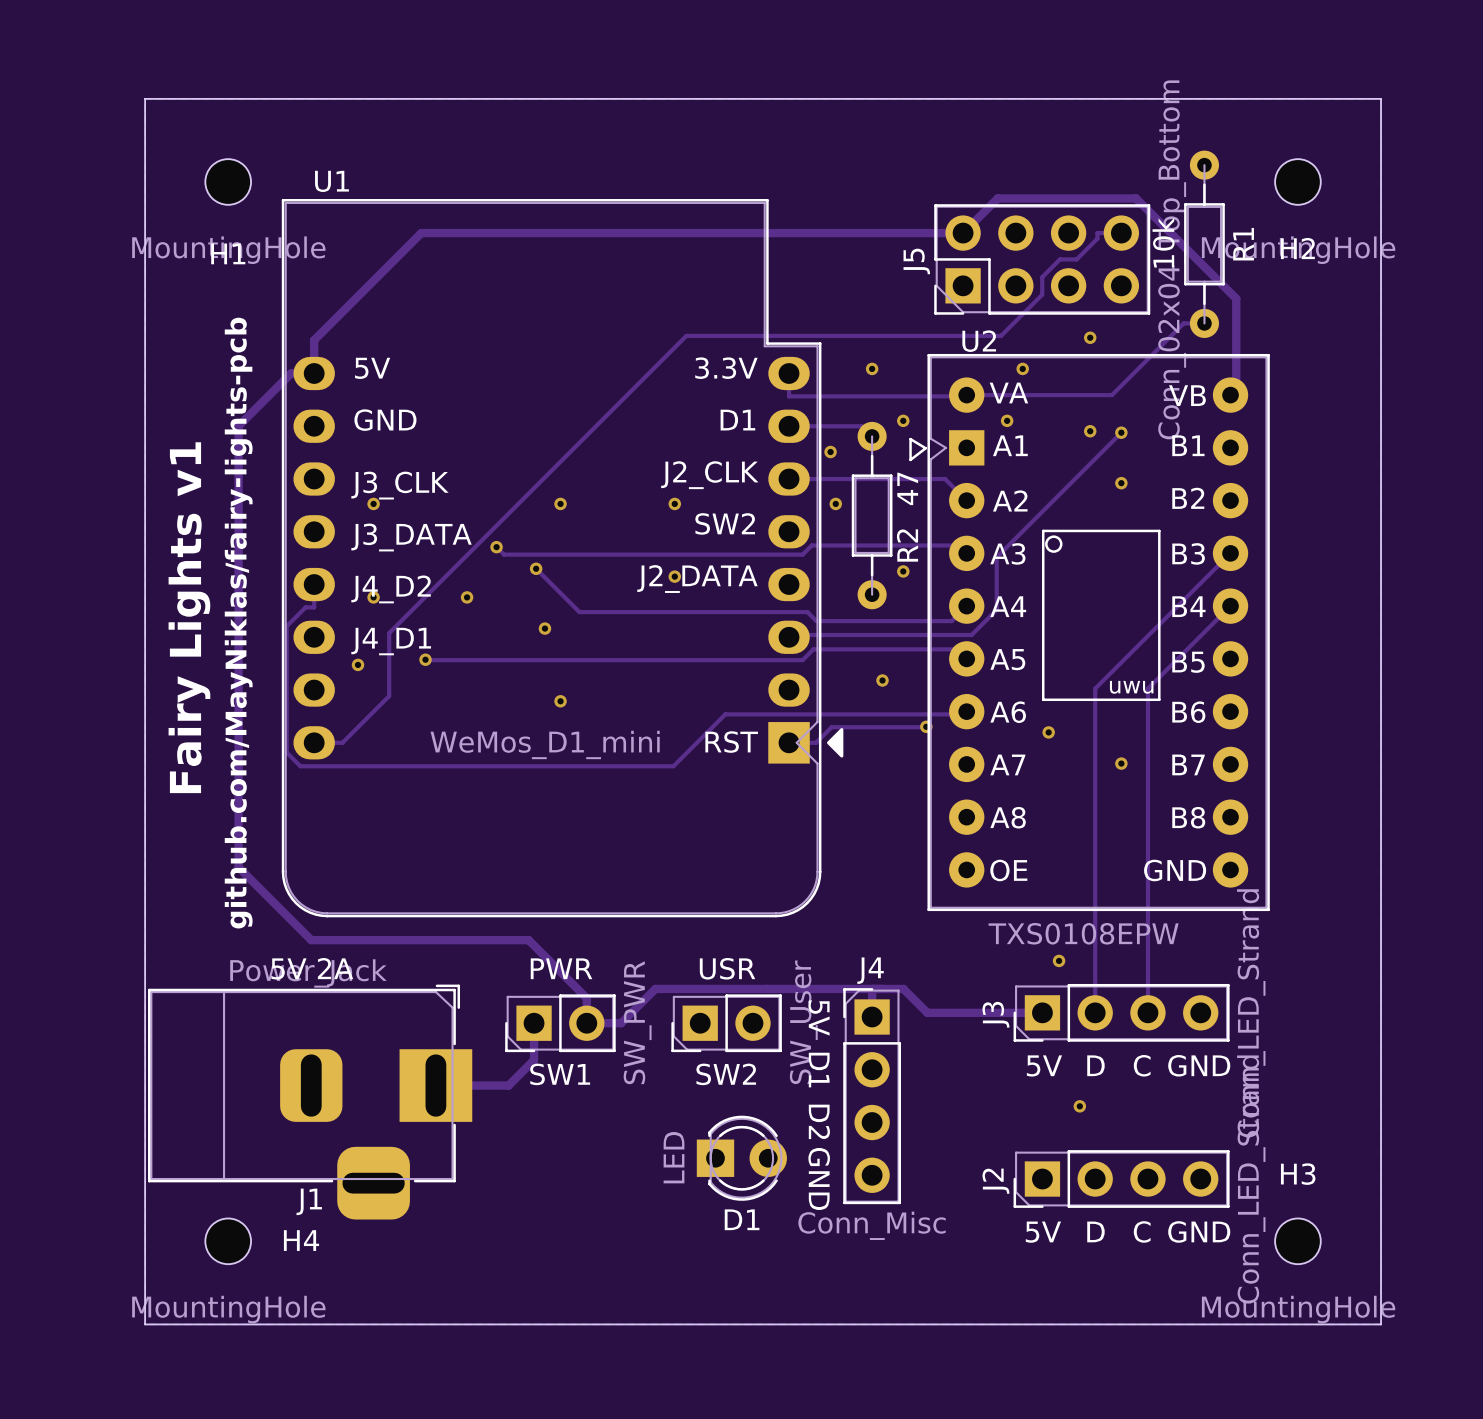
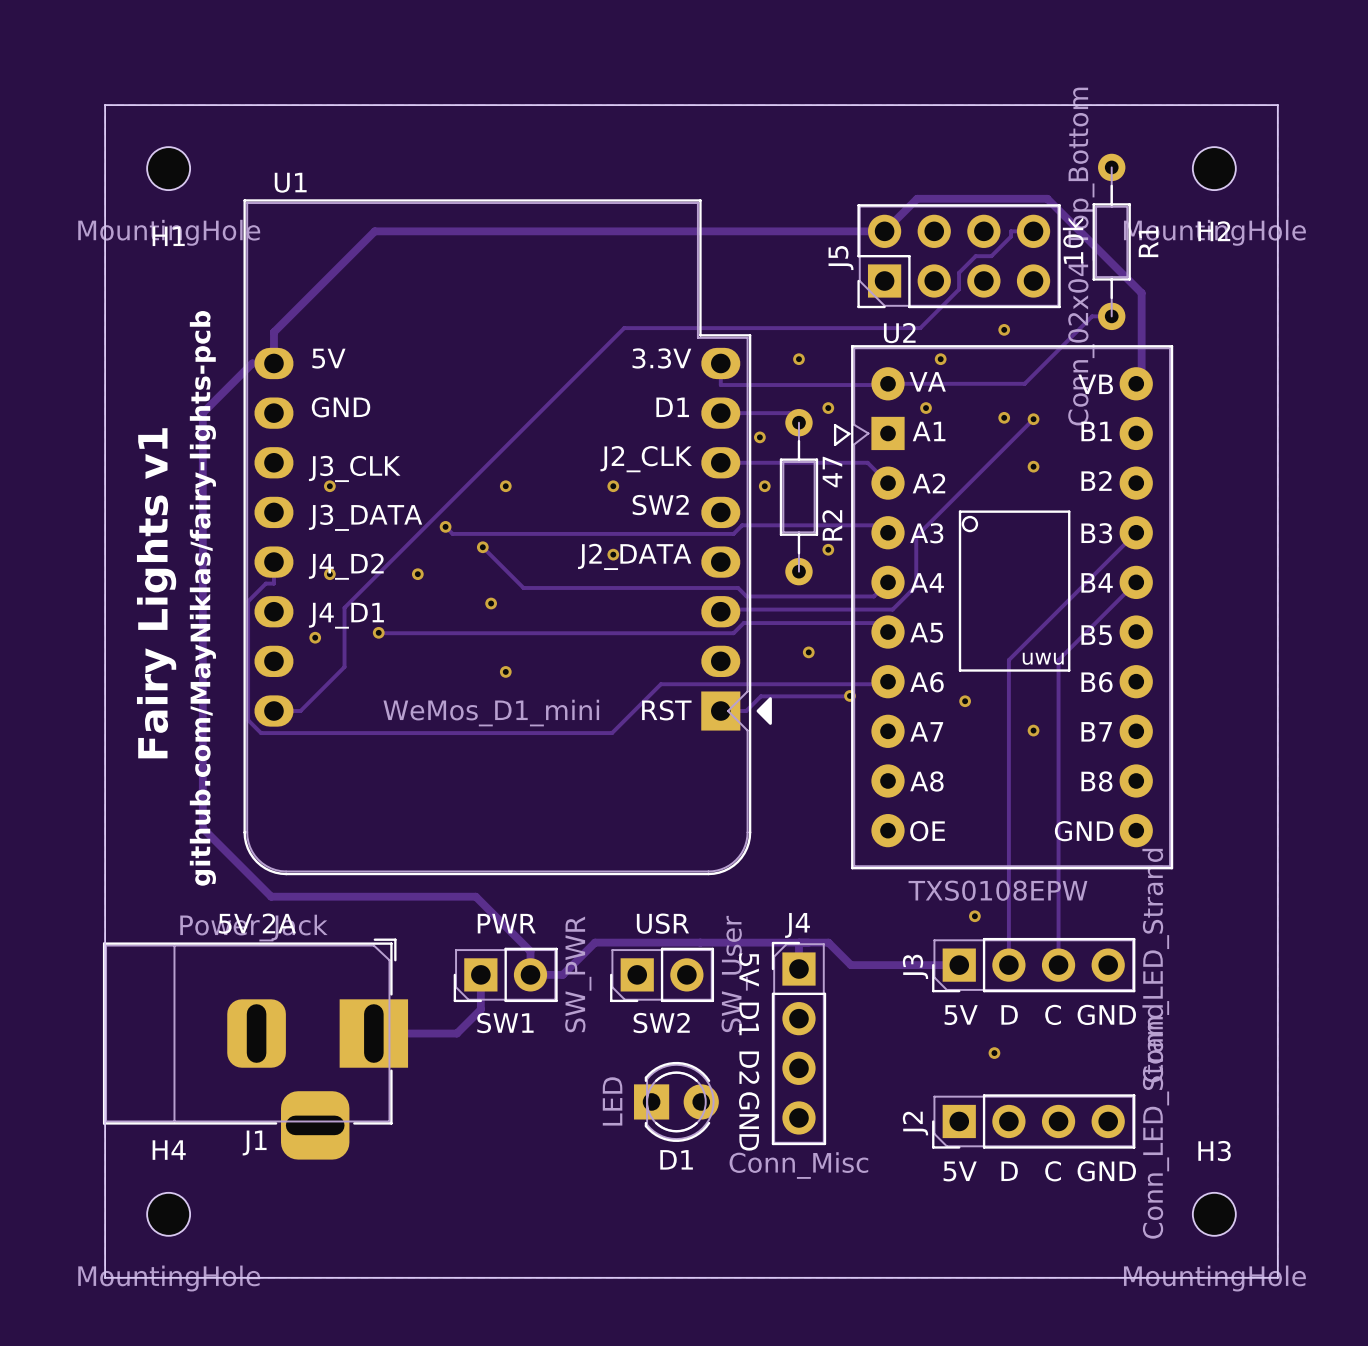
board edge: (145, 98) (145, 1324) (1381, 1324) -> (114, 105) (105, 105) (105, 1277) (1277, 1277) (1277, 1258)
H1 position: (228, 181) -> (168, 168)
H2 position: (1297, 181) -> (1214, 168)
text position: 5V 2A (312, 968) -> 5V 2A (257, 923)
J1 position: (310, 1102) -> (255, 1049)
H4 name position: H4 (301, 1240) -> H4 (169, 1150)
H4 position: (228, 1241) -> (168, 1214)
H3 position: (1297, 1241) -> (1214, 1214)

